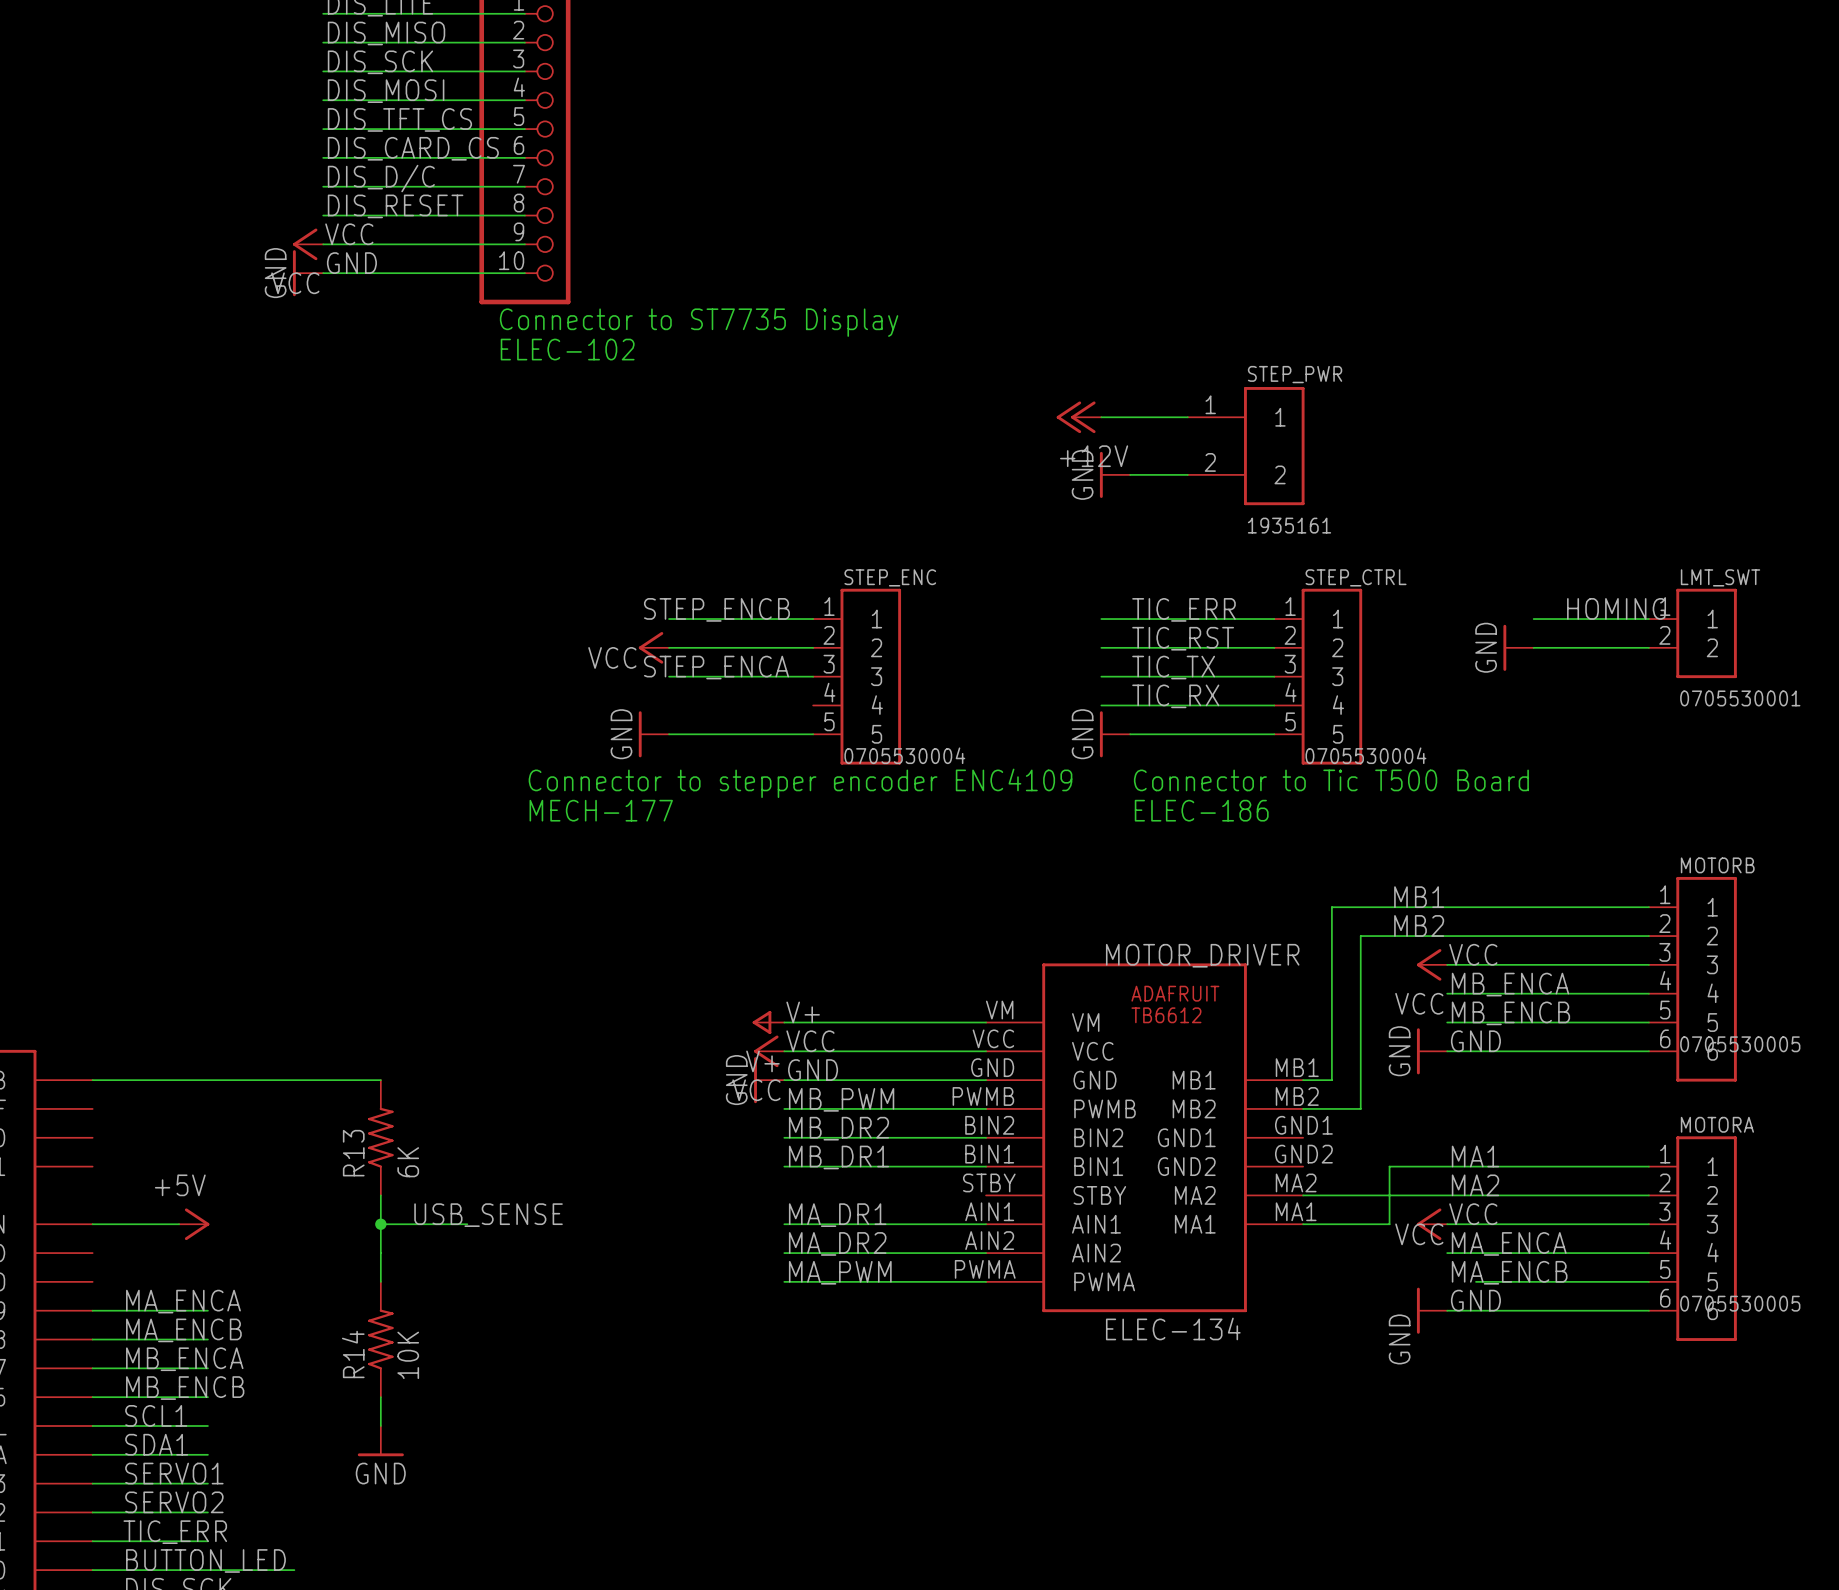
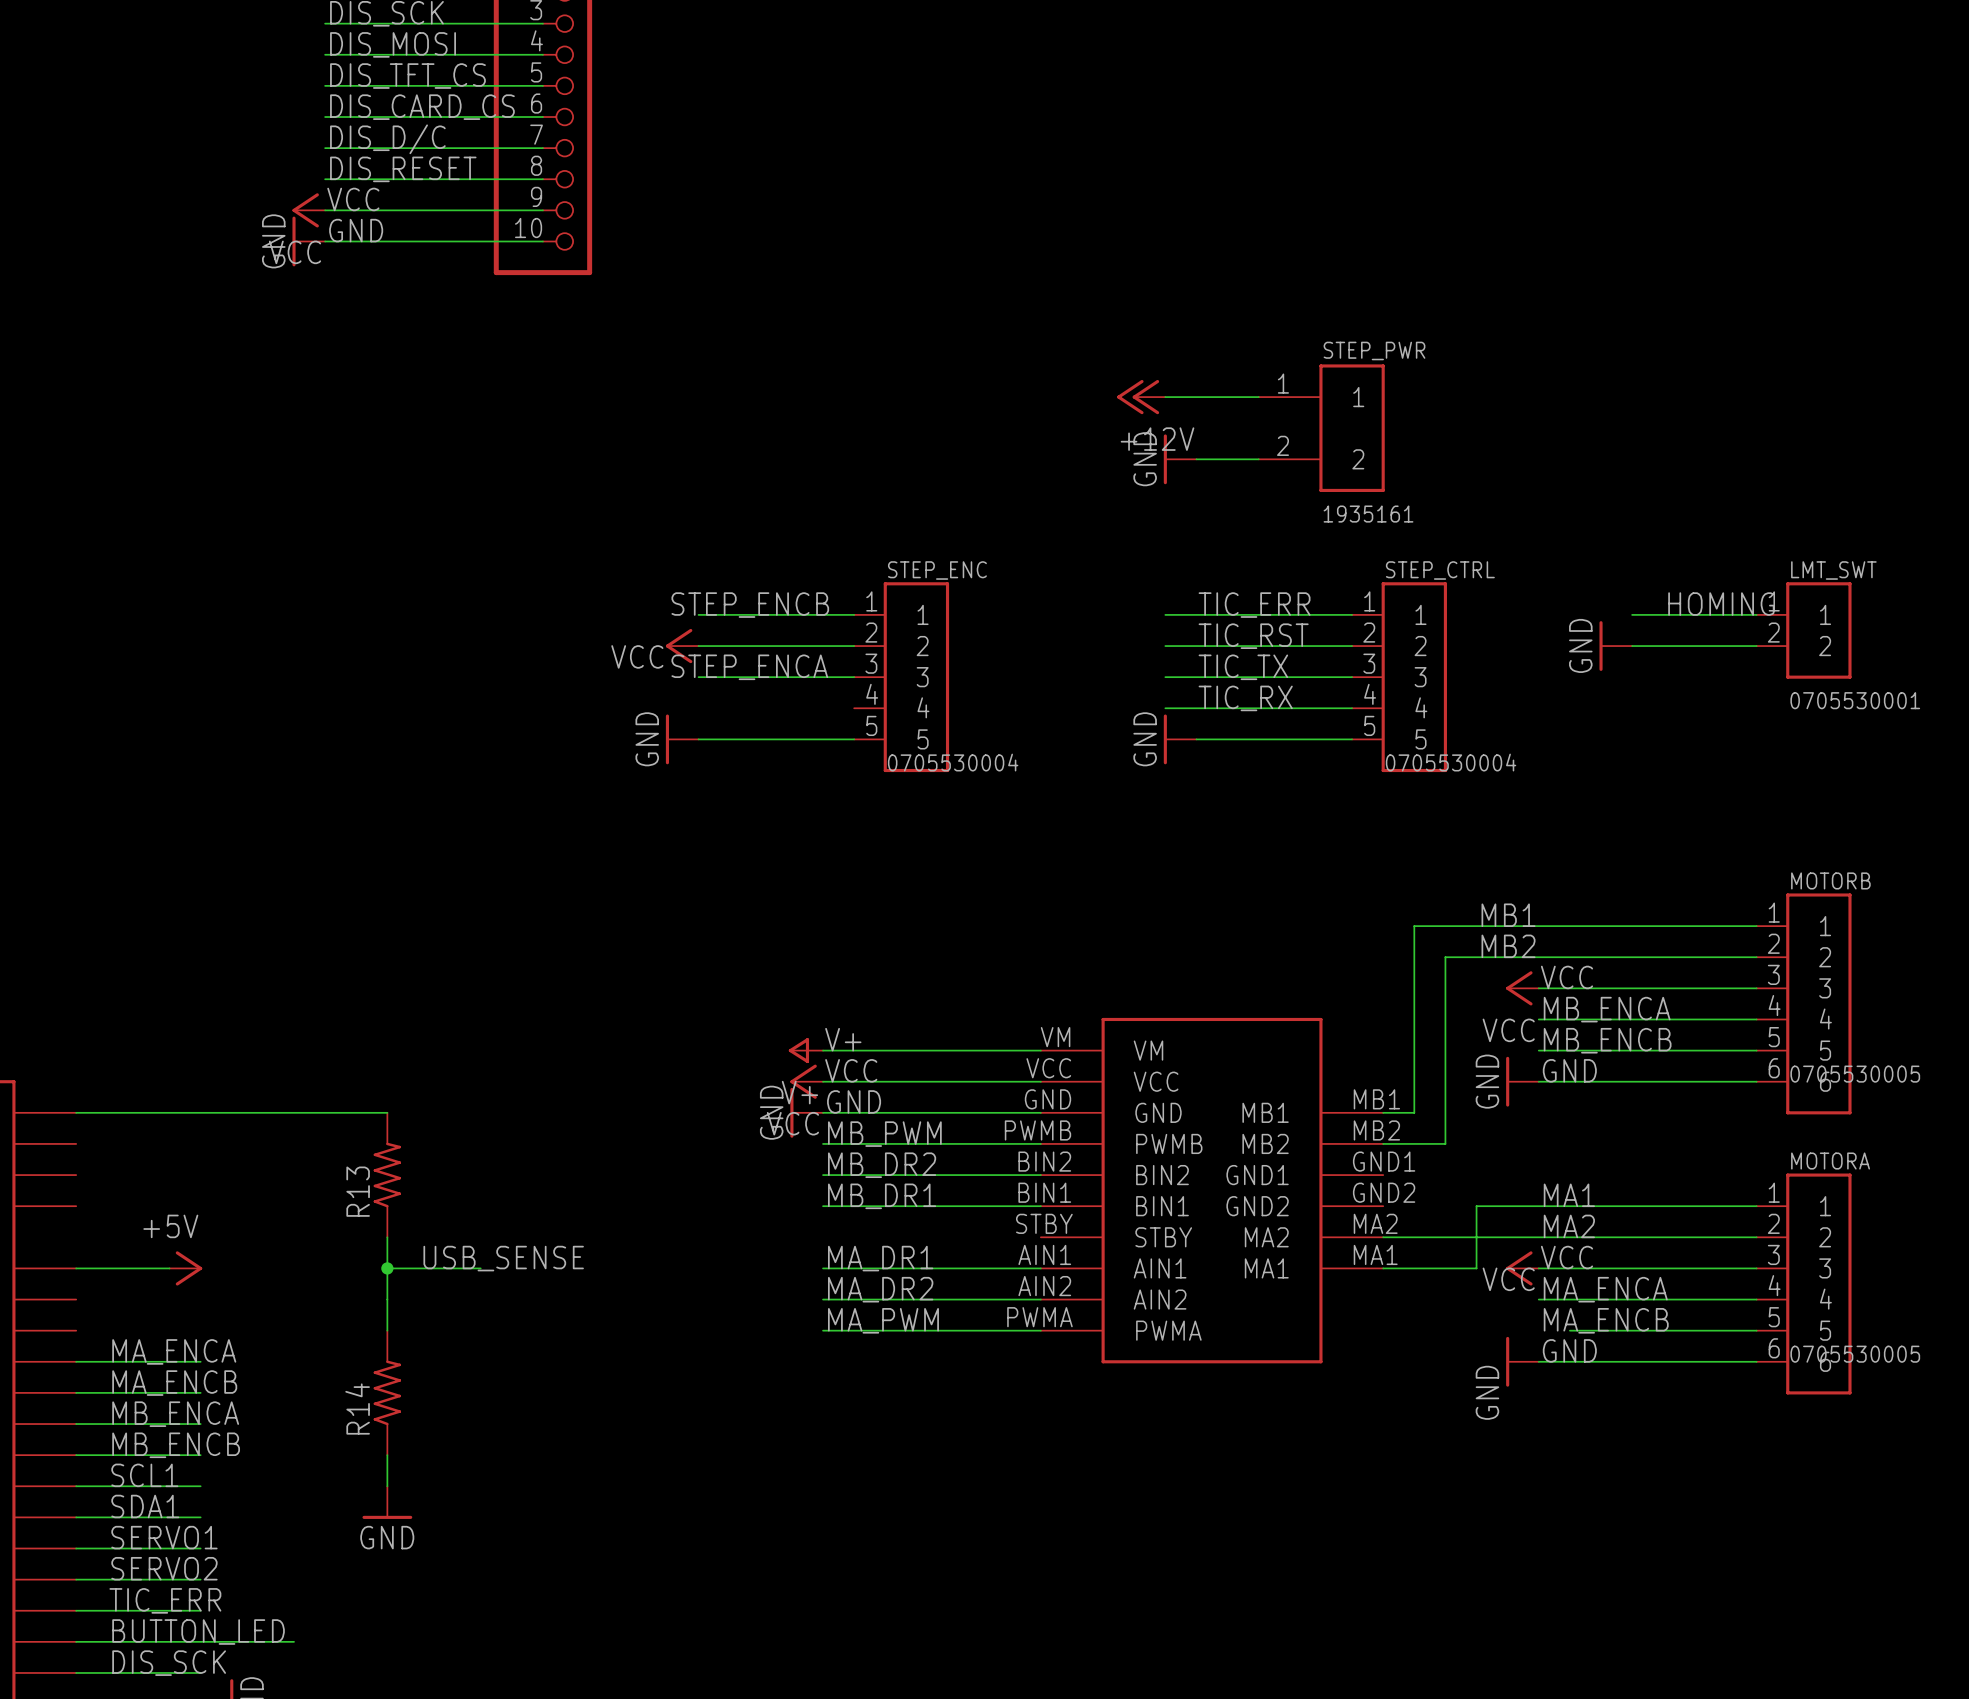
text: Connector to ST7735 Display (699, 322) -> none
text: ELEC-102 (567, 349) -> none
text: Connector to Tic T500 Board (1331, 780) -> none
text: Connector to stepper encoder ENC4109 (800, 783) -> none
text: MECH-177 (601, 810) -> none
text: ELEC-186 (1201, 810) -> none
MOTOR_DRIVER: ELEC-134 (1144, 1137) -> none
part: none -> (1212, 1190)
R13 value: 6K (408, 1162) -> none
R14 value: 10K (408, 1355) -> none

